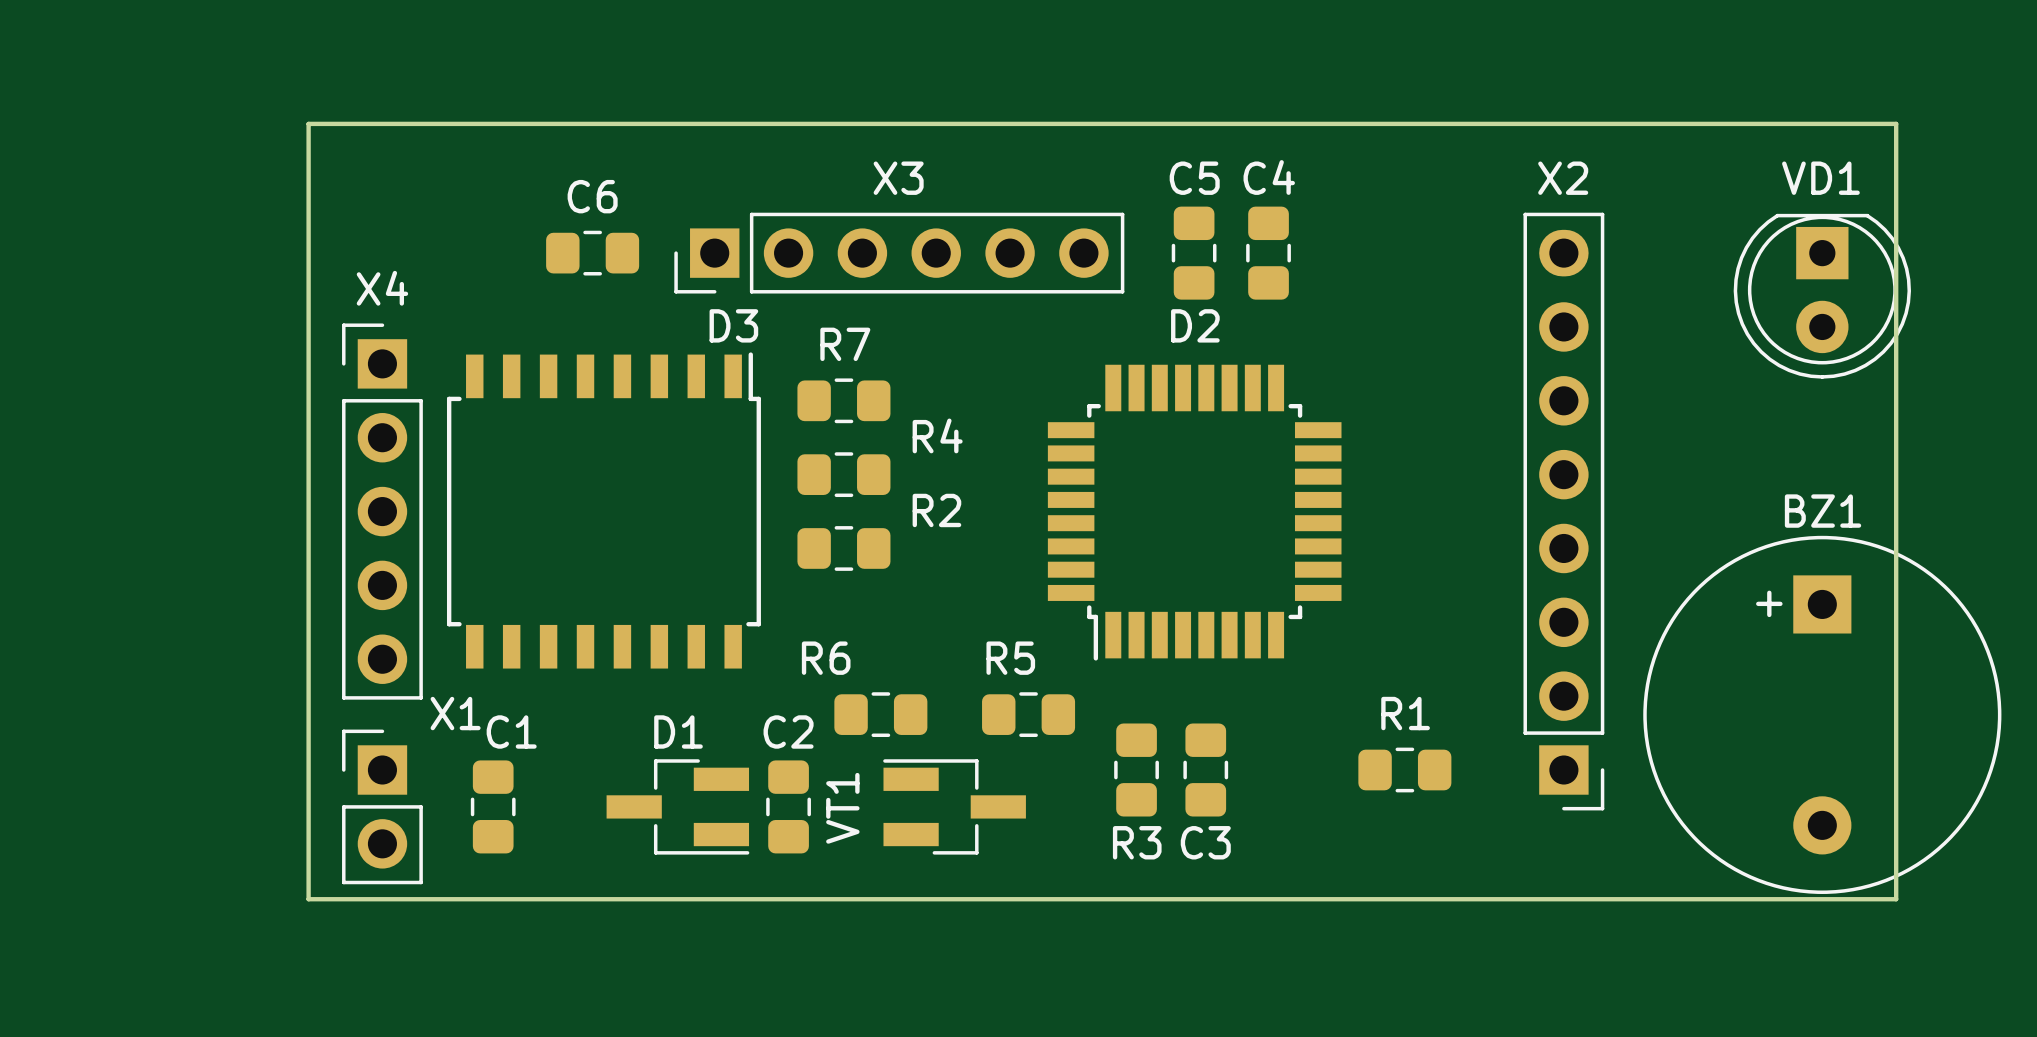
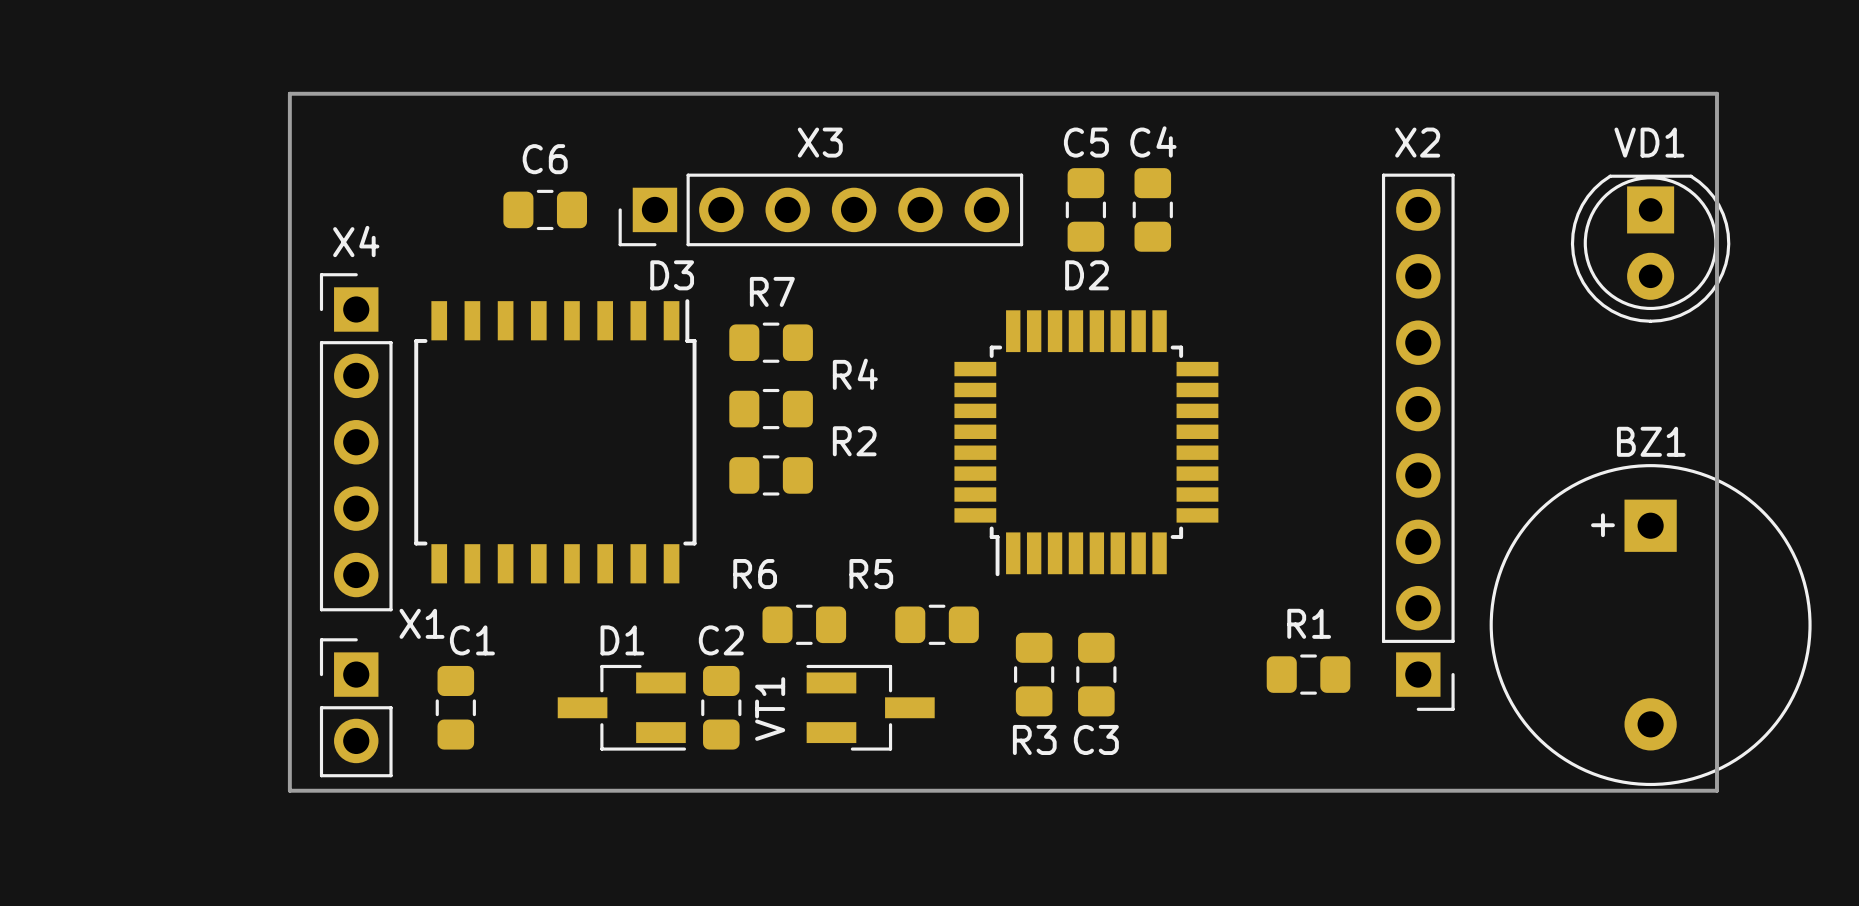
R5 name position: R5 (1010, 658) -> R5 (871, 574)
R1 position: (1404, 770) -> (1308, 674)

